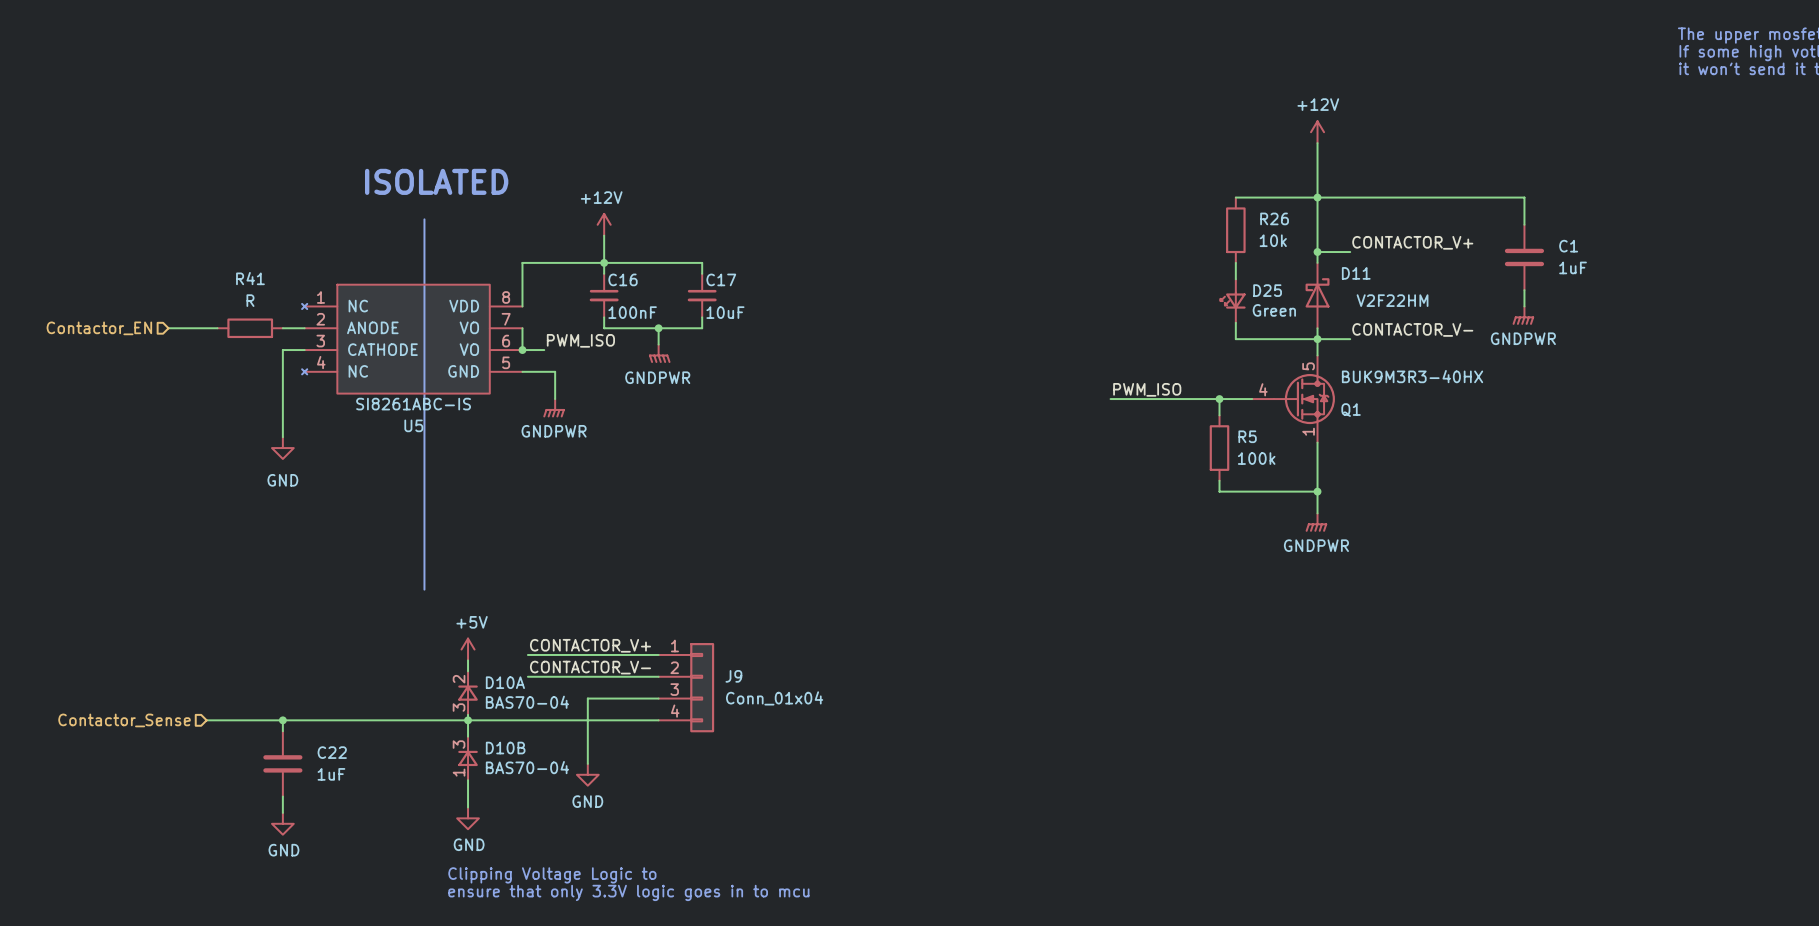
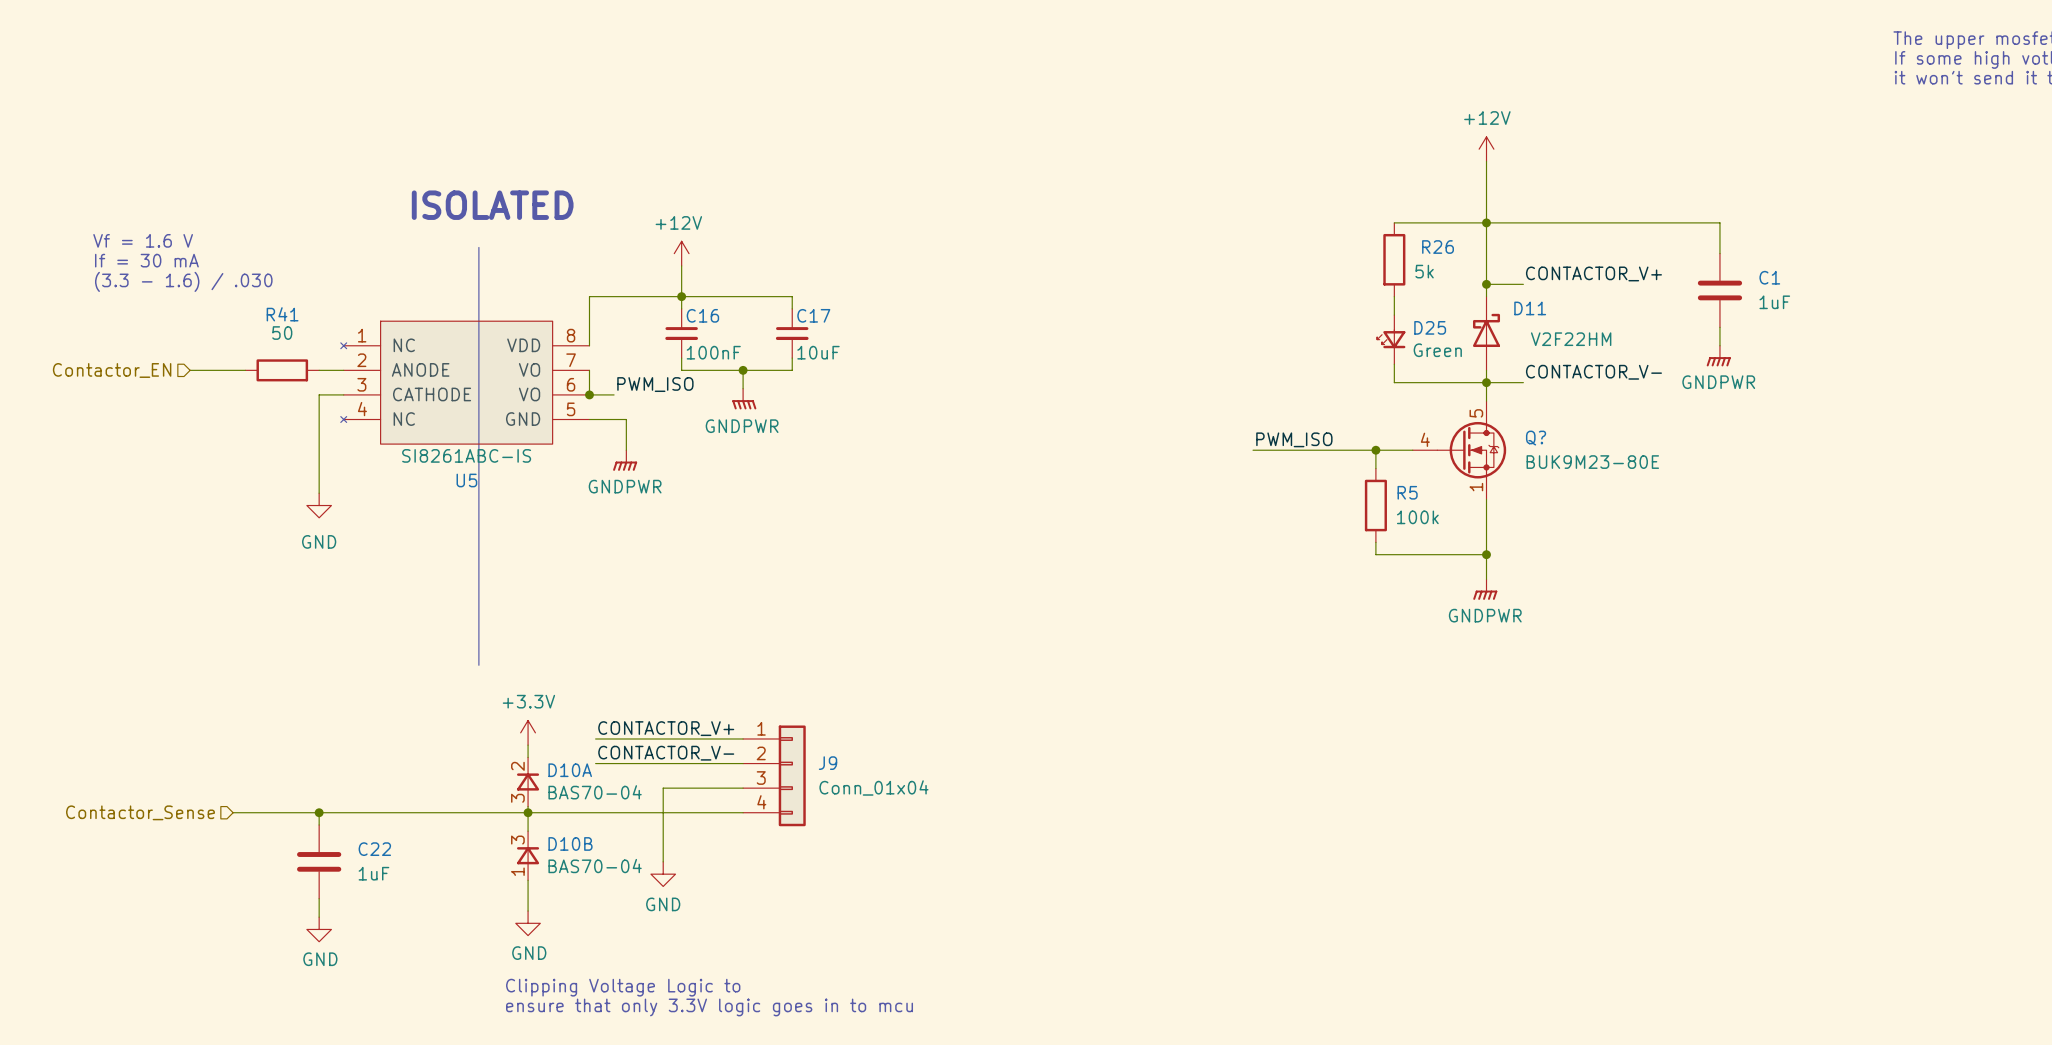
text: none -> Vf = 1.6 V (143, 240)
text: none -> If = 30 mA (146, 260)
R26 value: 10k (1273, 240) -> 5k (1424, 271)
text: none -> (3.3 - 1.6) / .030 (183, 281)
R41 value: R (250, 300) -> 50 (282, 333)
Q1 value: BUK9M3R3-40HX (1412, 376) -> BUK9M23-80E (1592, 462)
Q1 name: Q1 (1351, 410) -> Q? (1536, 438)
power symbol: +5V (468, 649) -> +3.3V (528, 732)

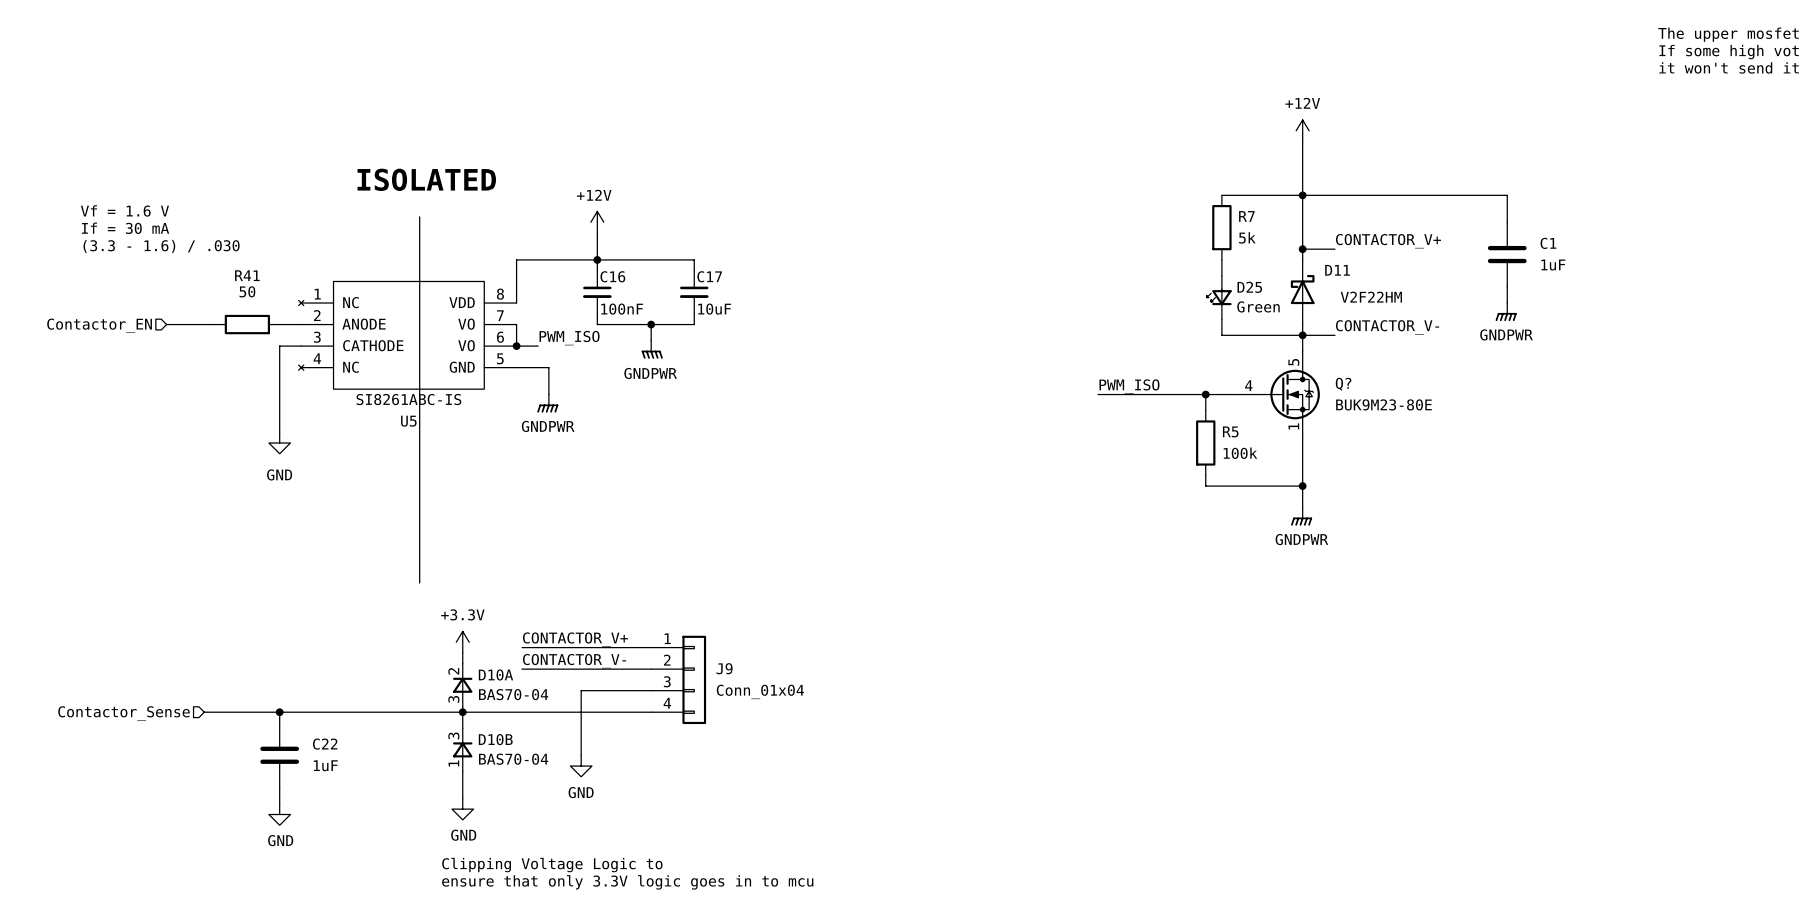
R26 name: R26 (1438, 247) -> R7 (1246, 216)

